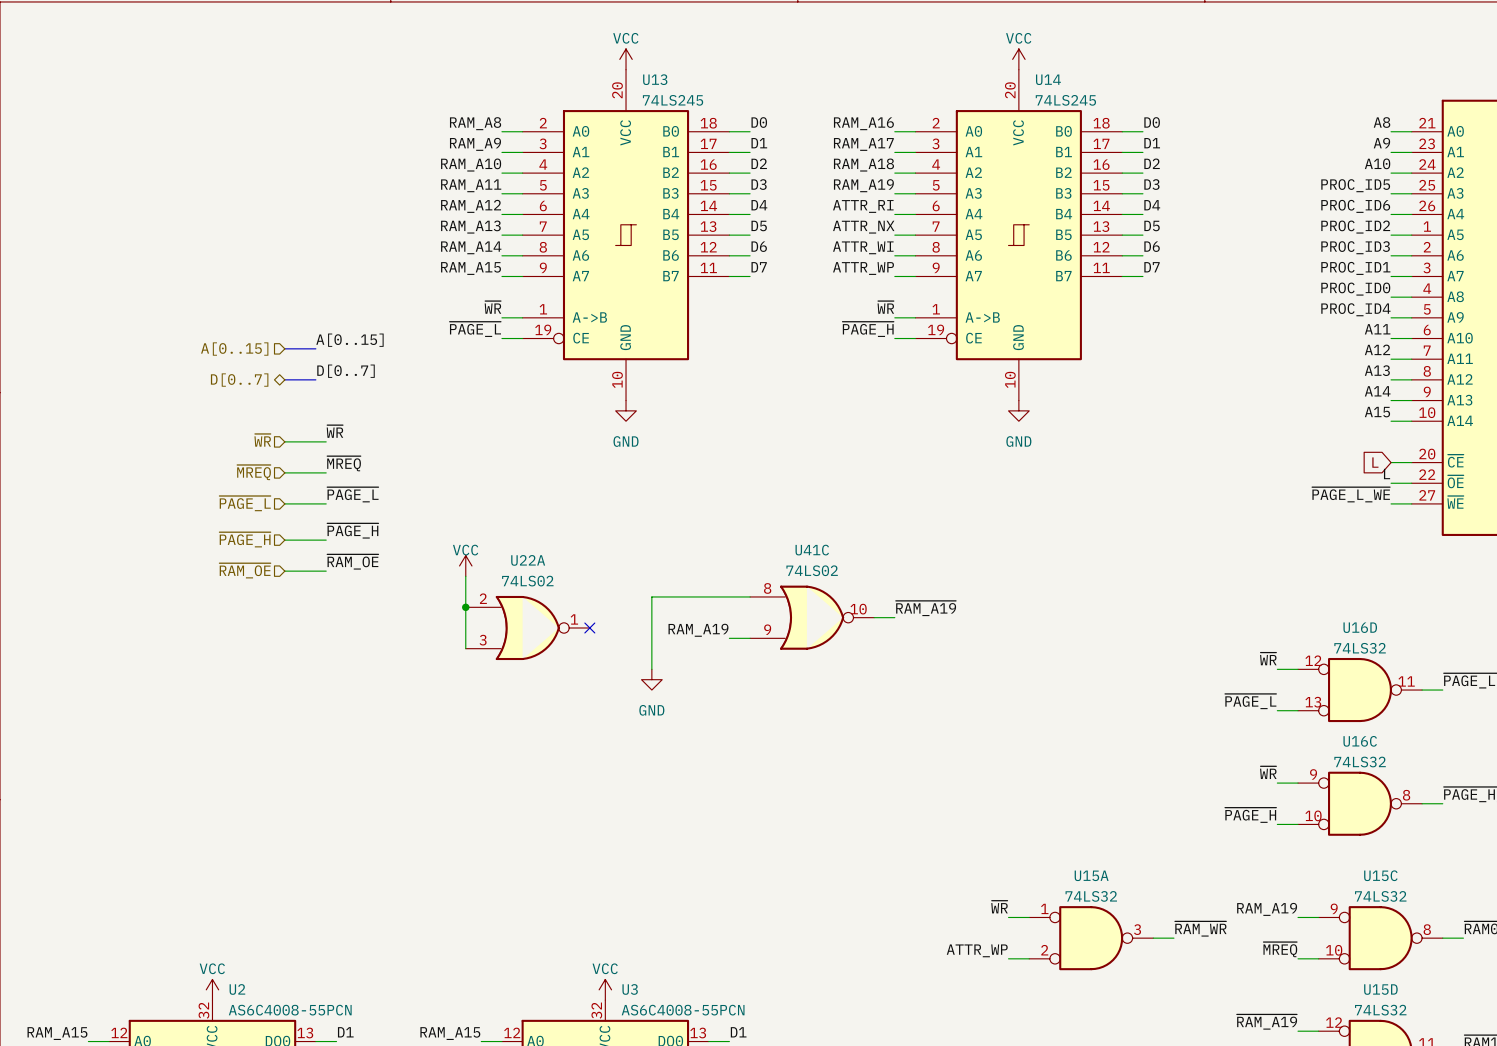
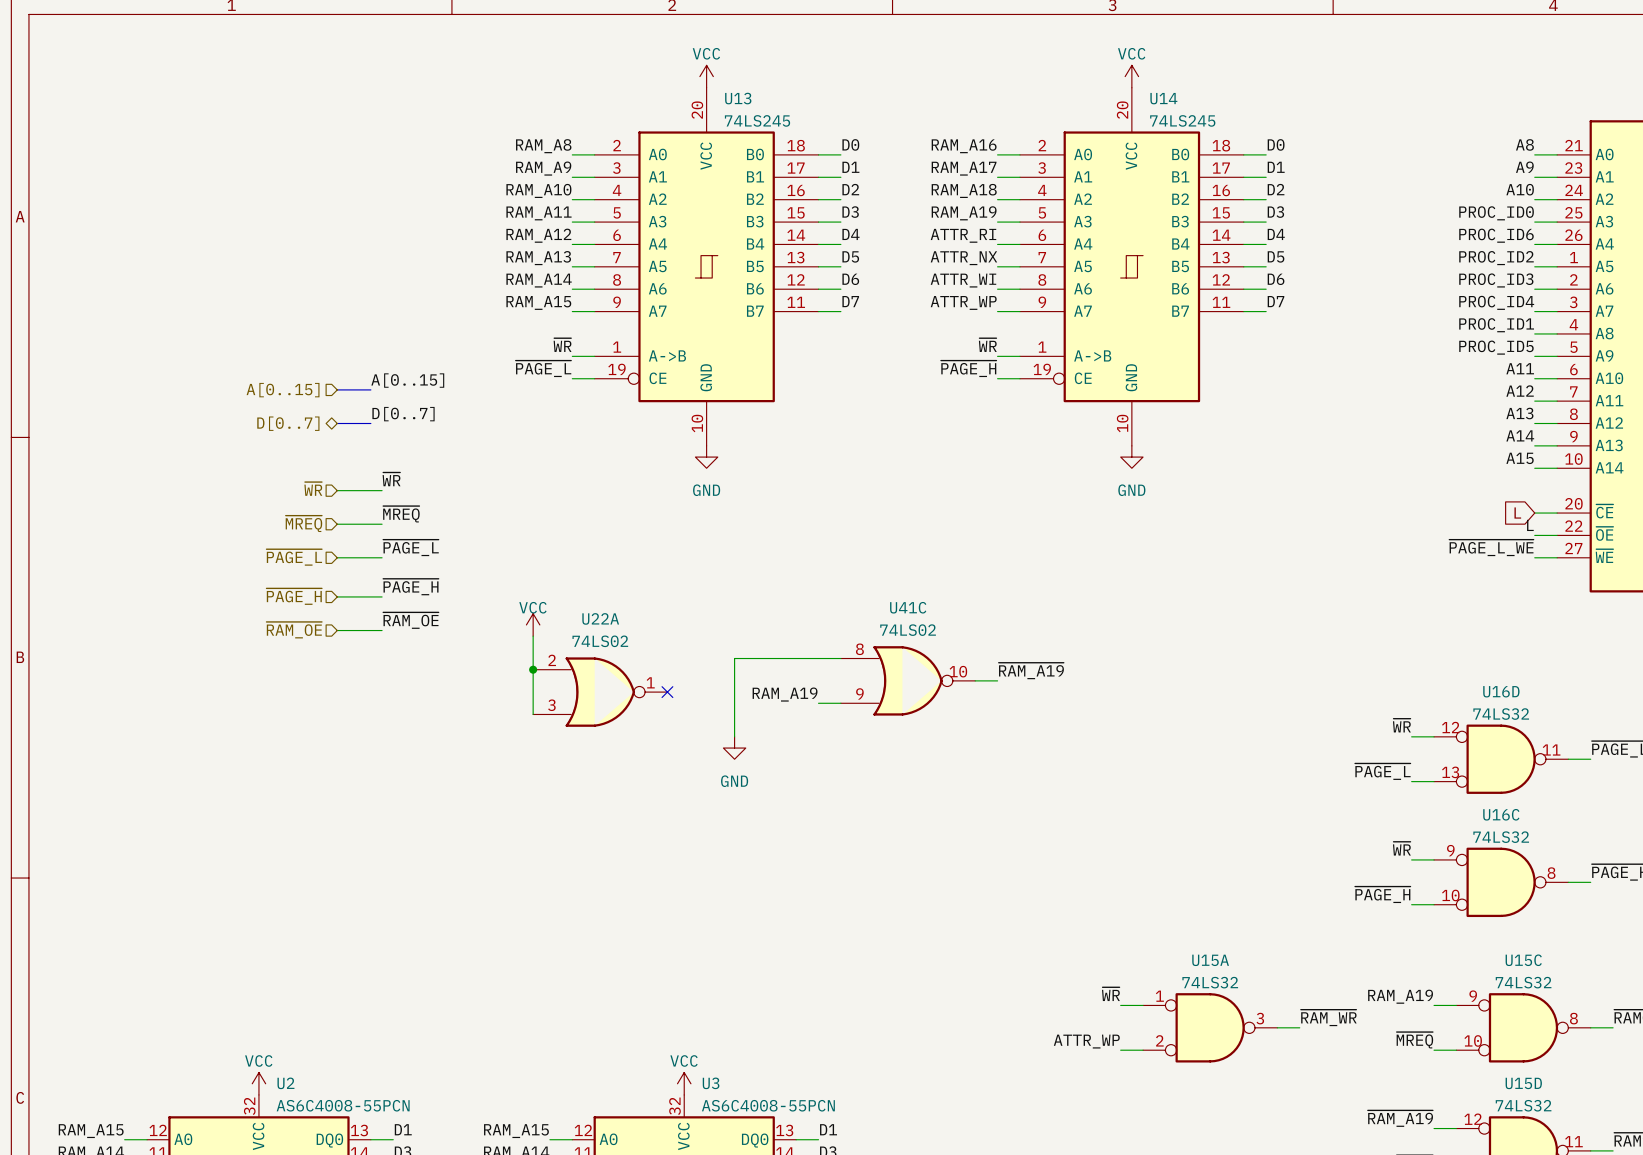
label: PROC_ID5 (1355, 185) -> PROC_ID0 (1496, 213)
label: PROC_ID1 (1355, 268) -> PROC_ID4 (1496, 302)
label: PROC_ID0 (1355, 289) -> PROC_ID1 (1496, 325)
label: PROC_ID4 (1355, 309) -> PROC_ID5 (1496, 347)

